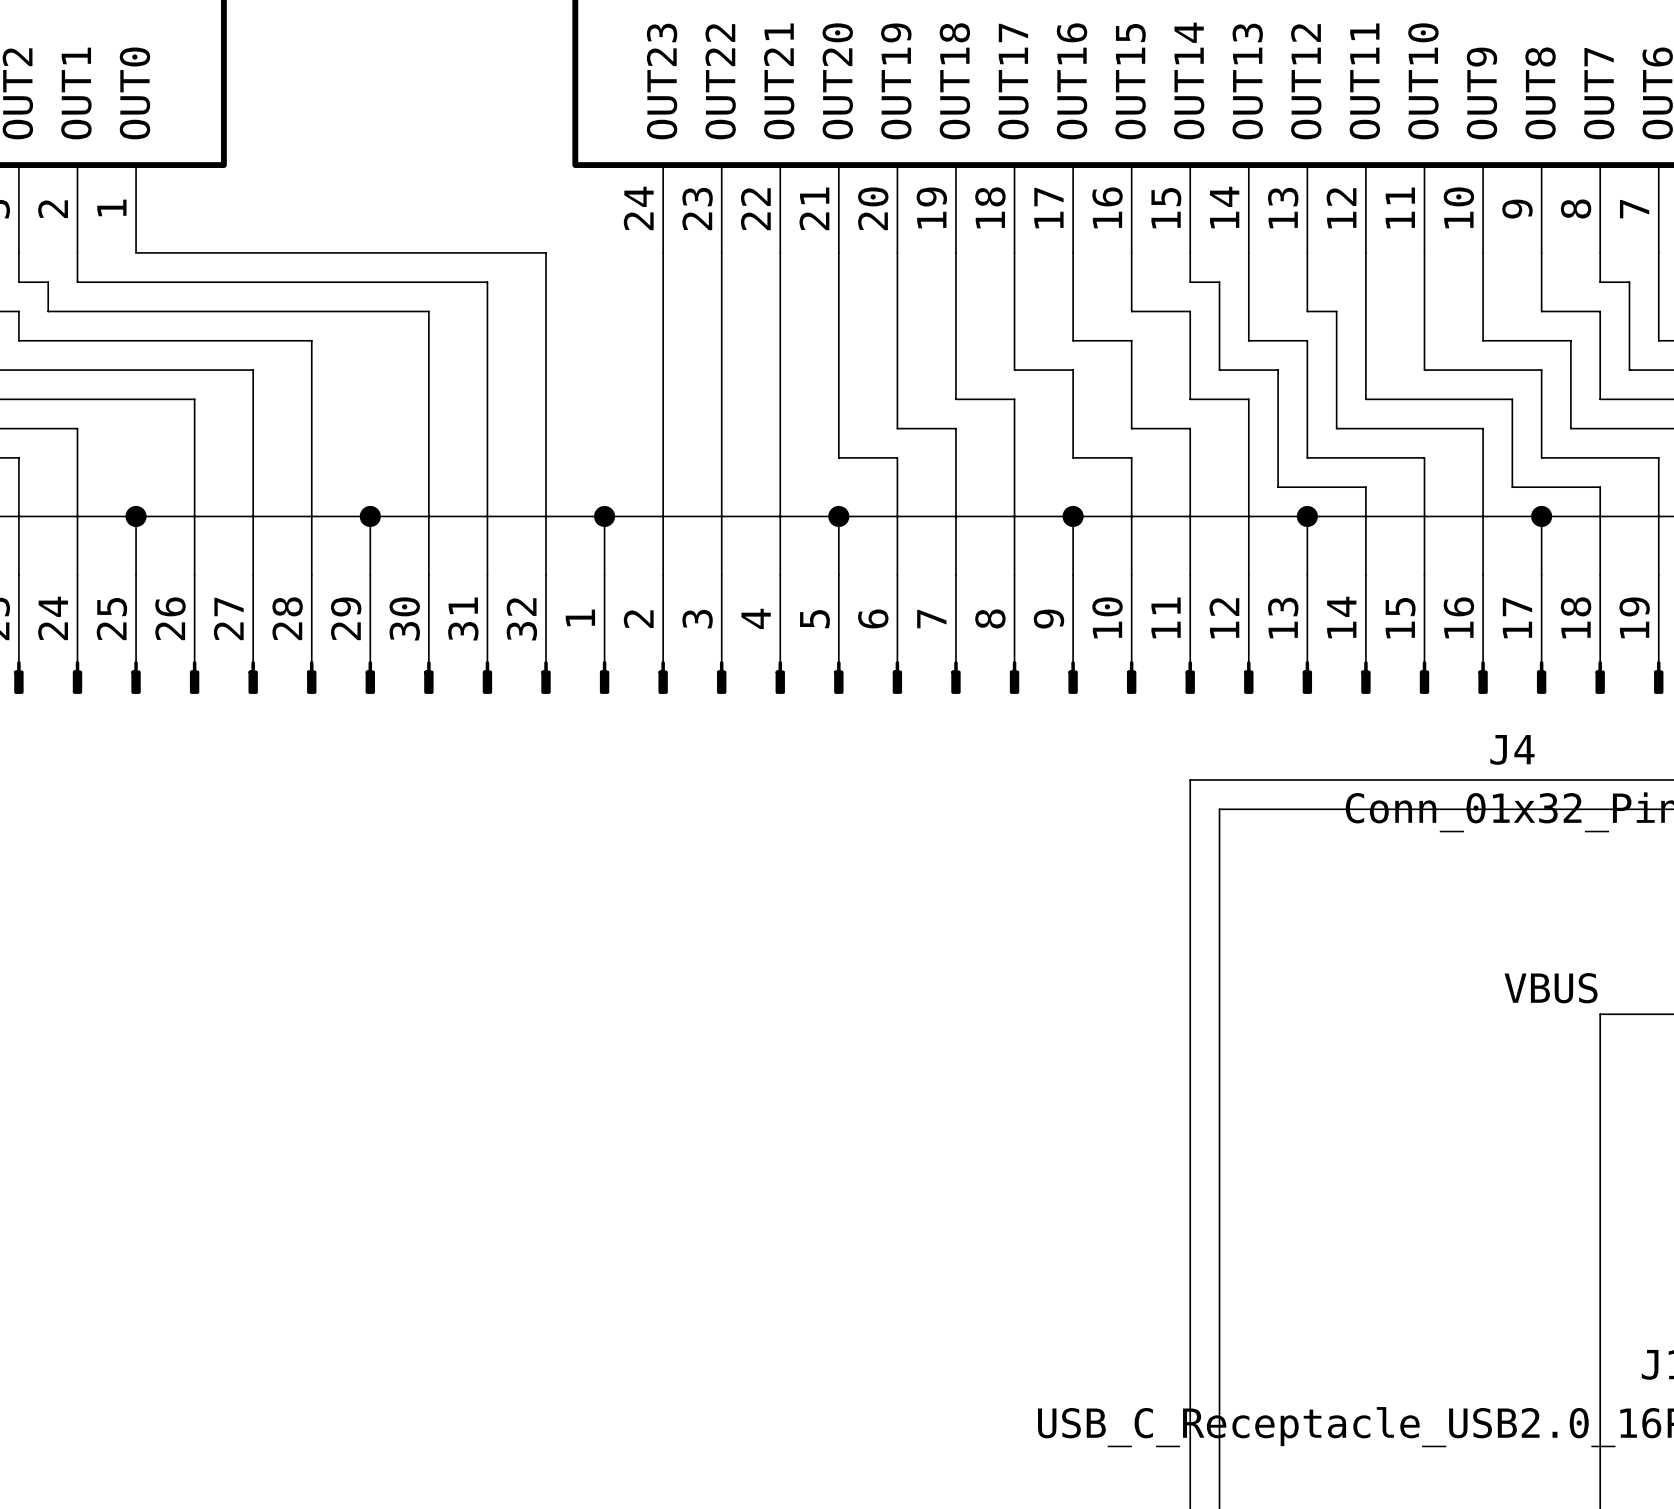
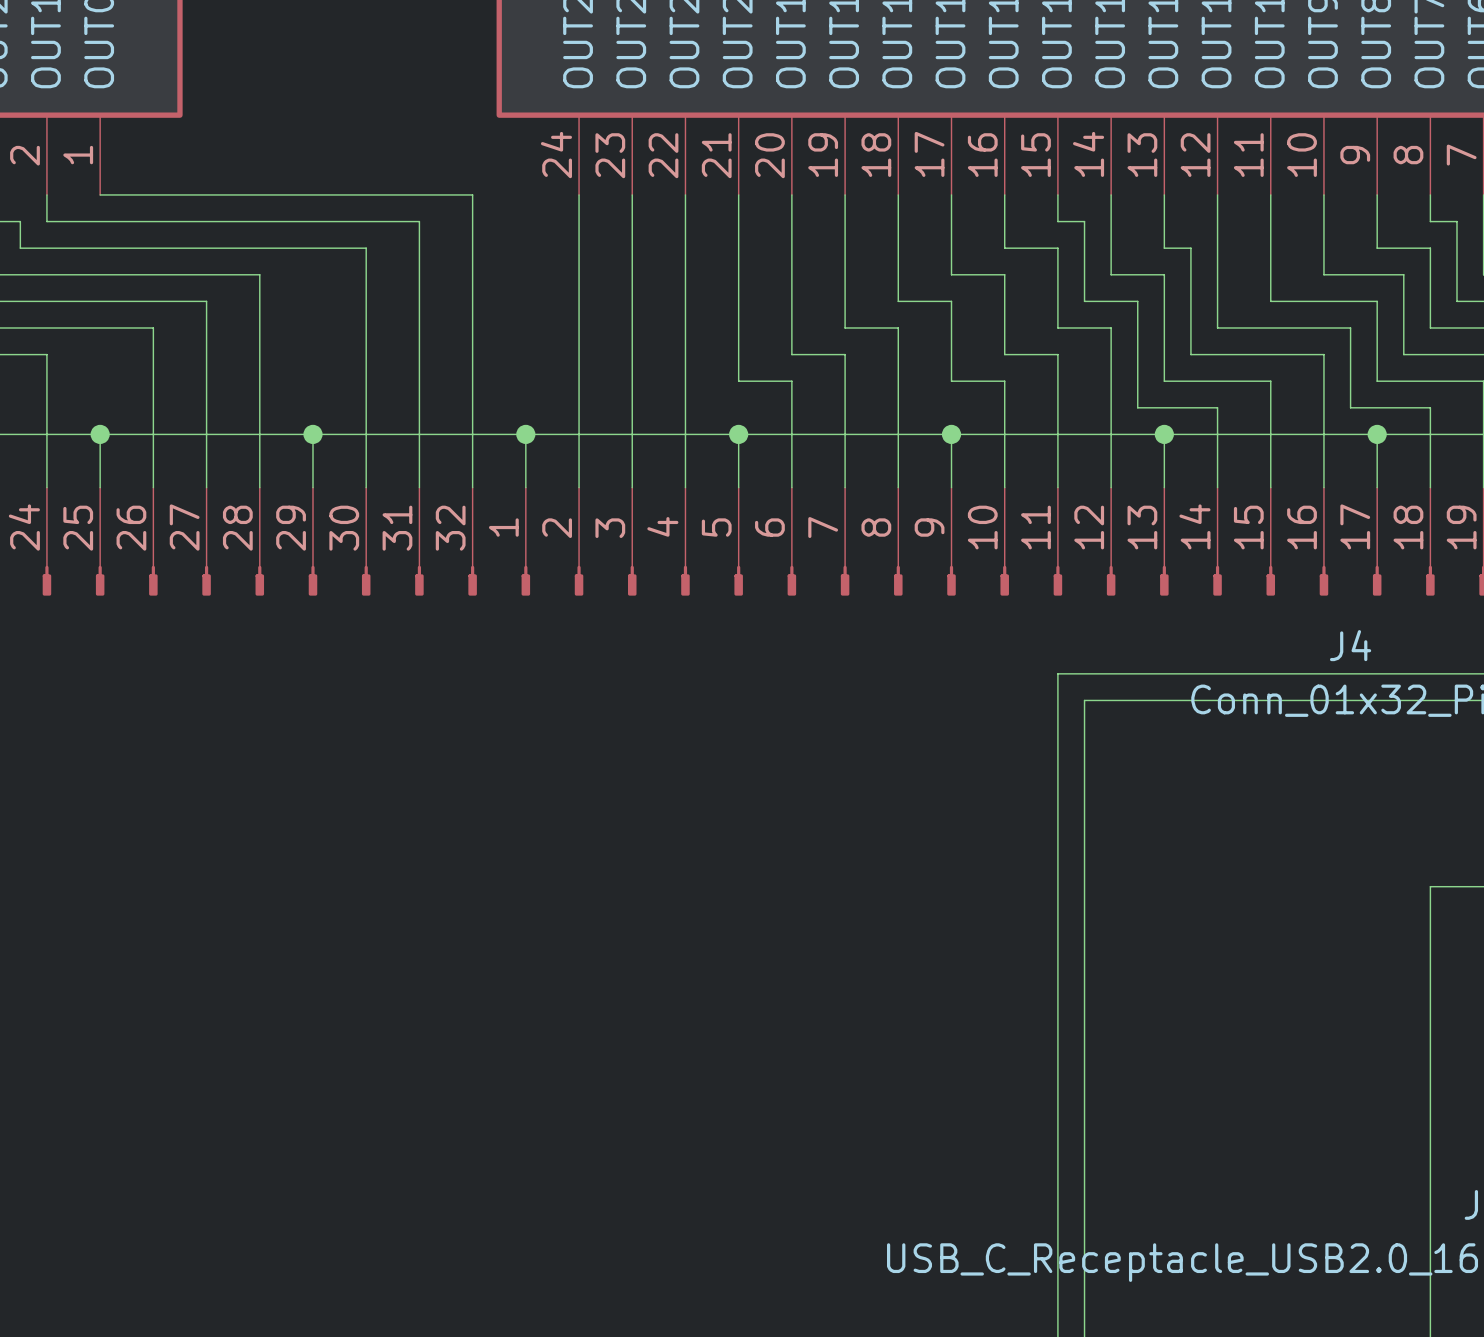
label: VBUS (1551, 988) -> none

